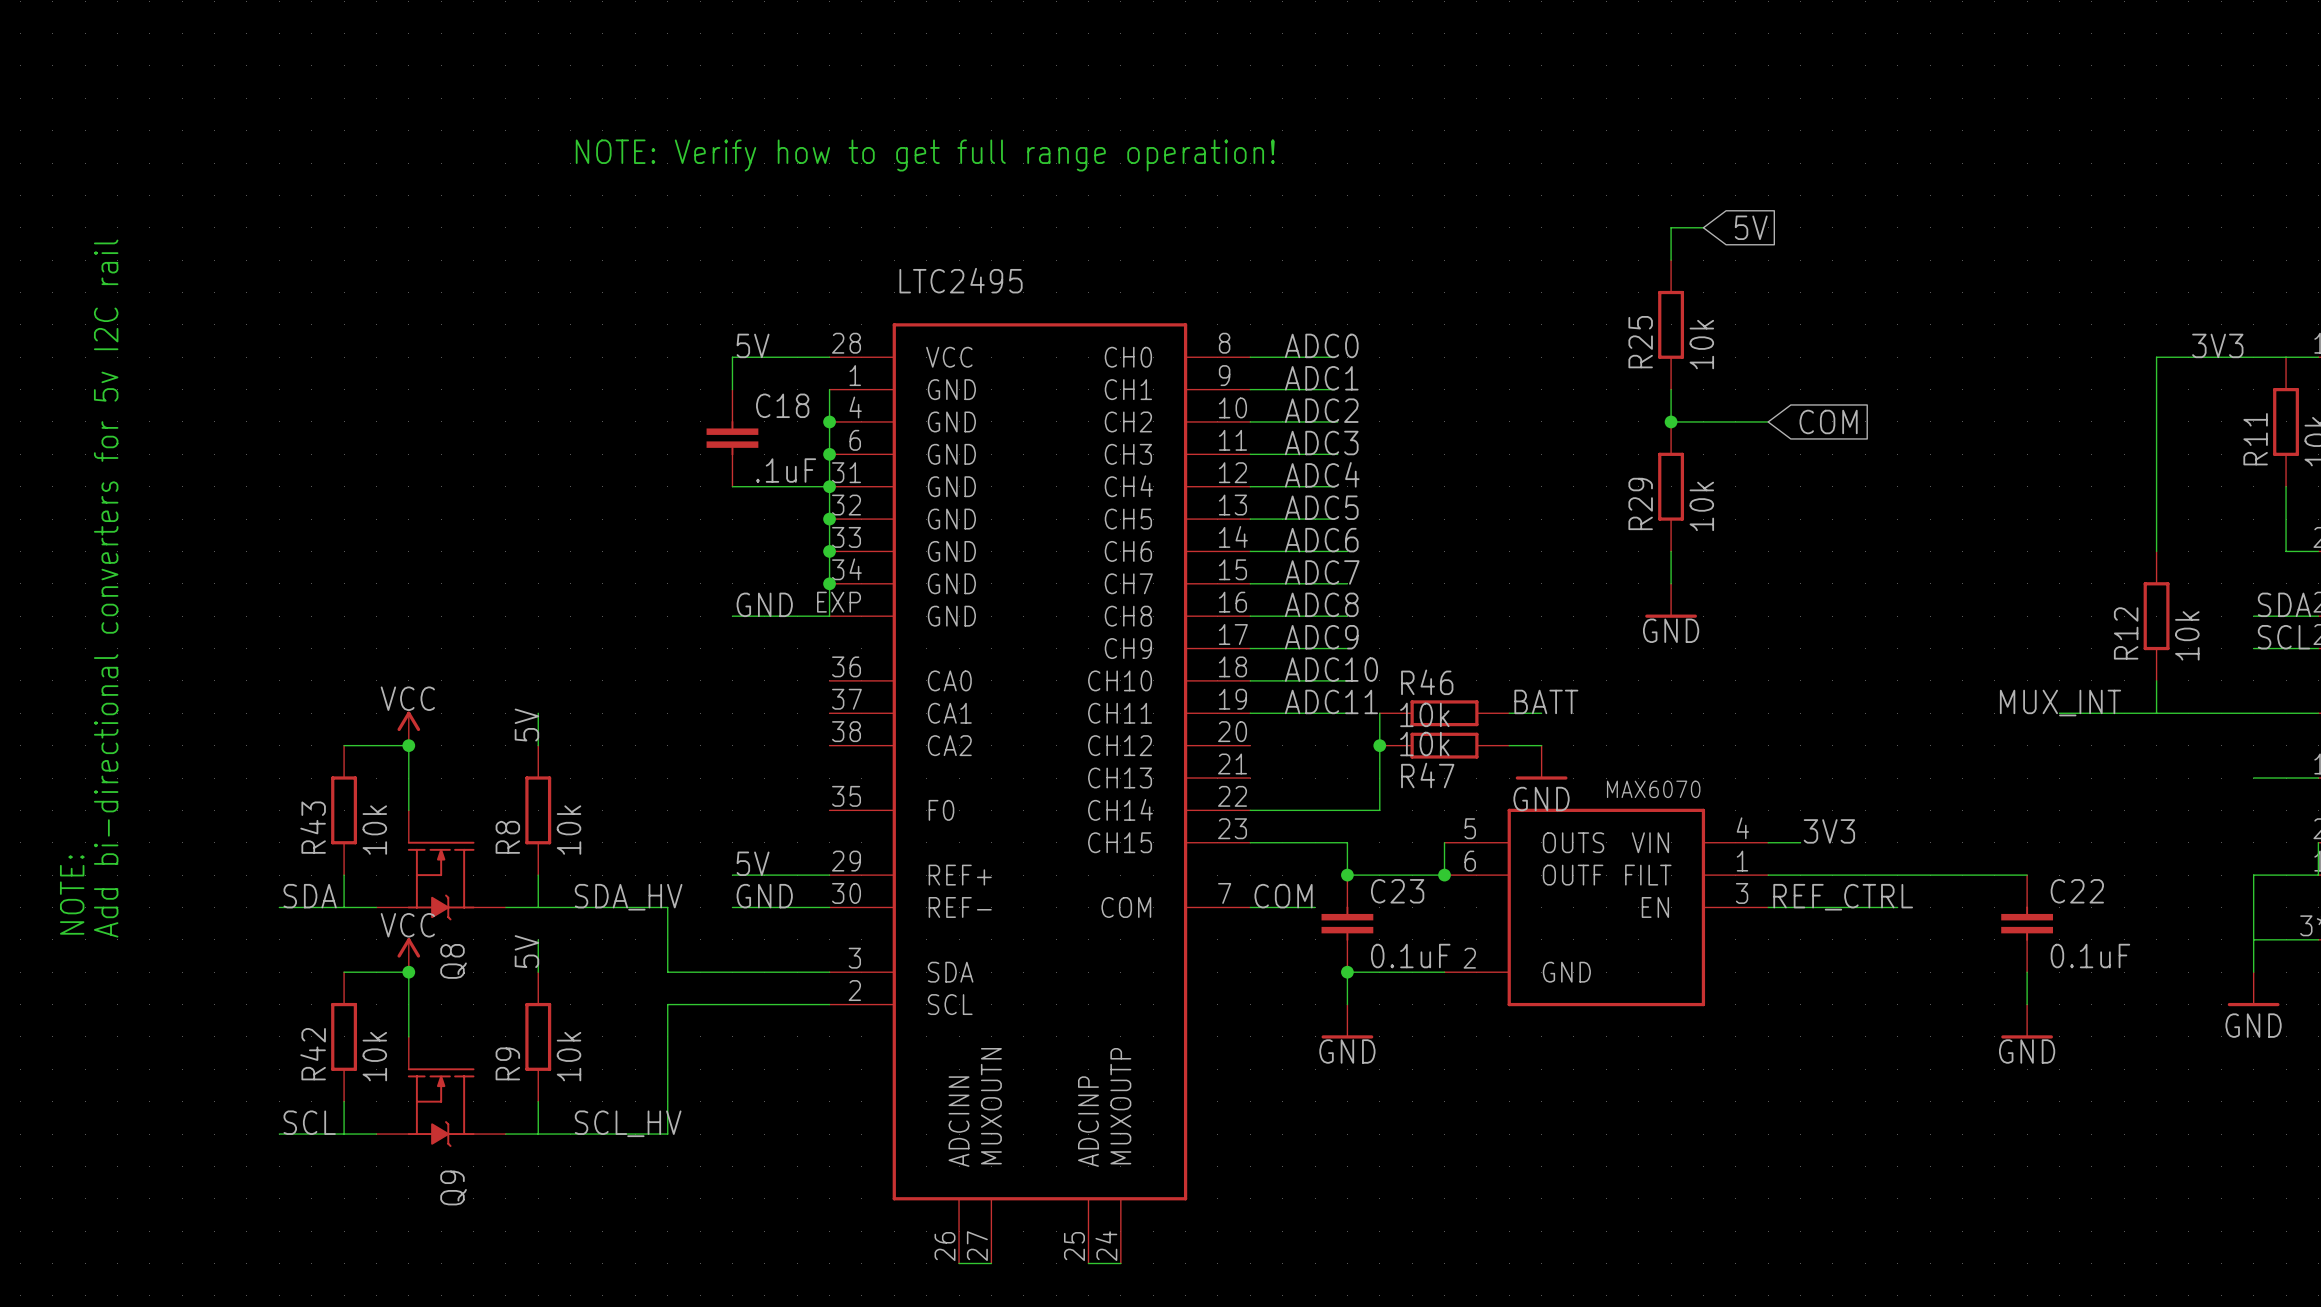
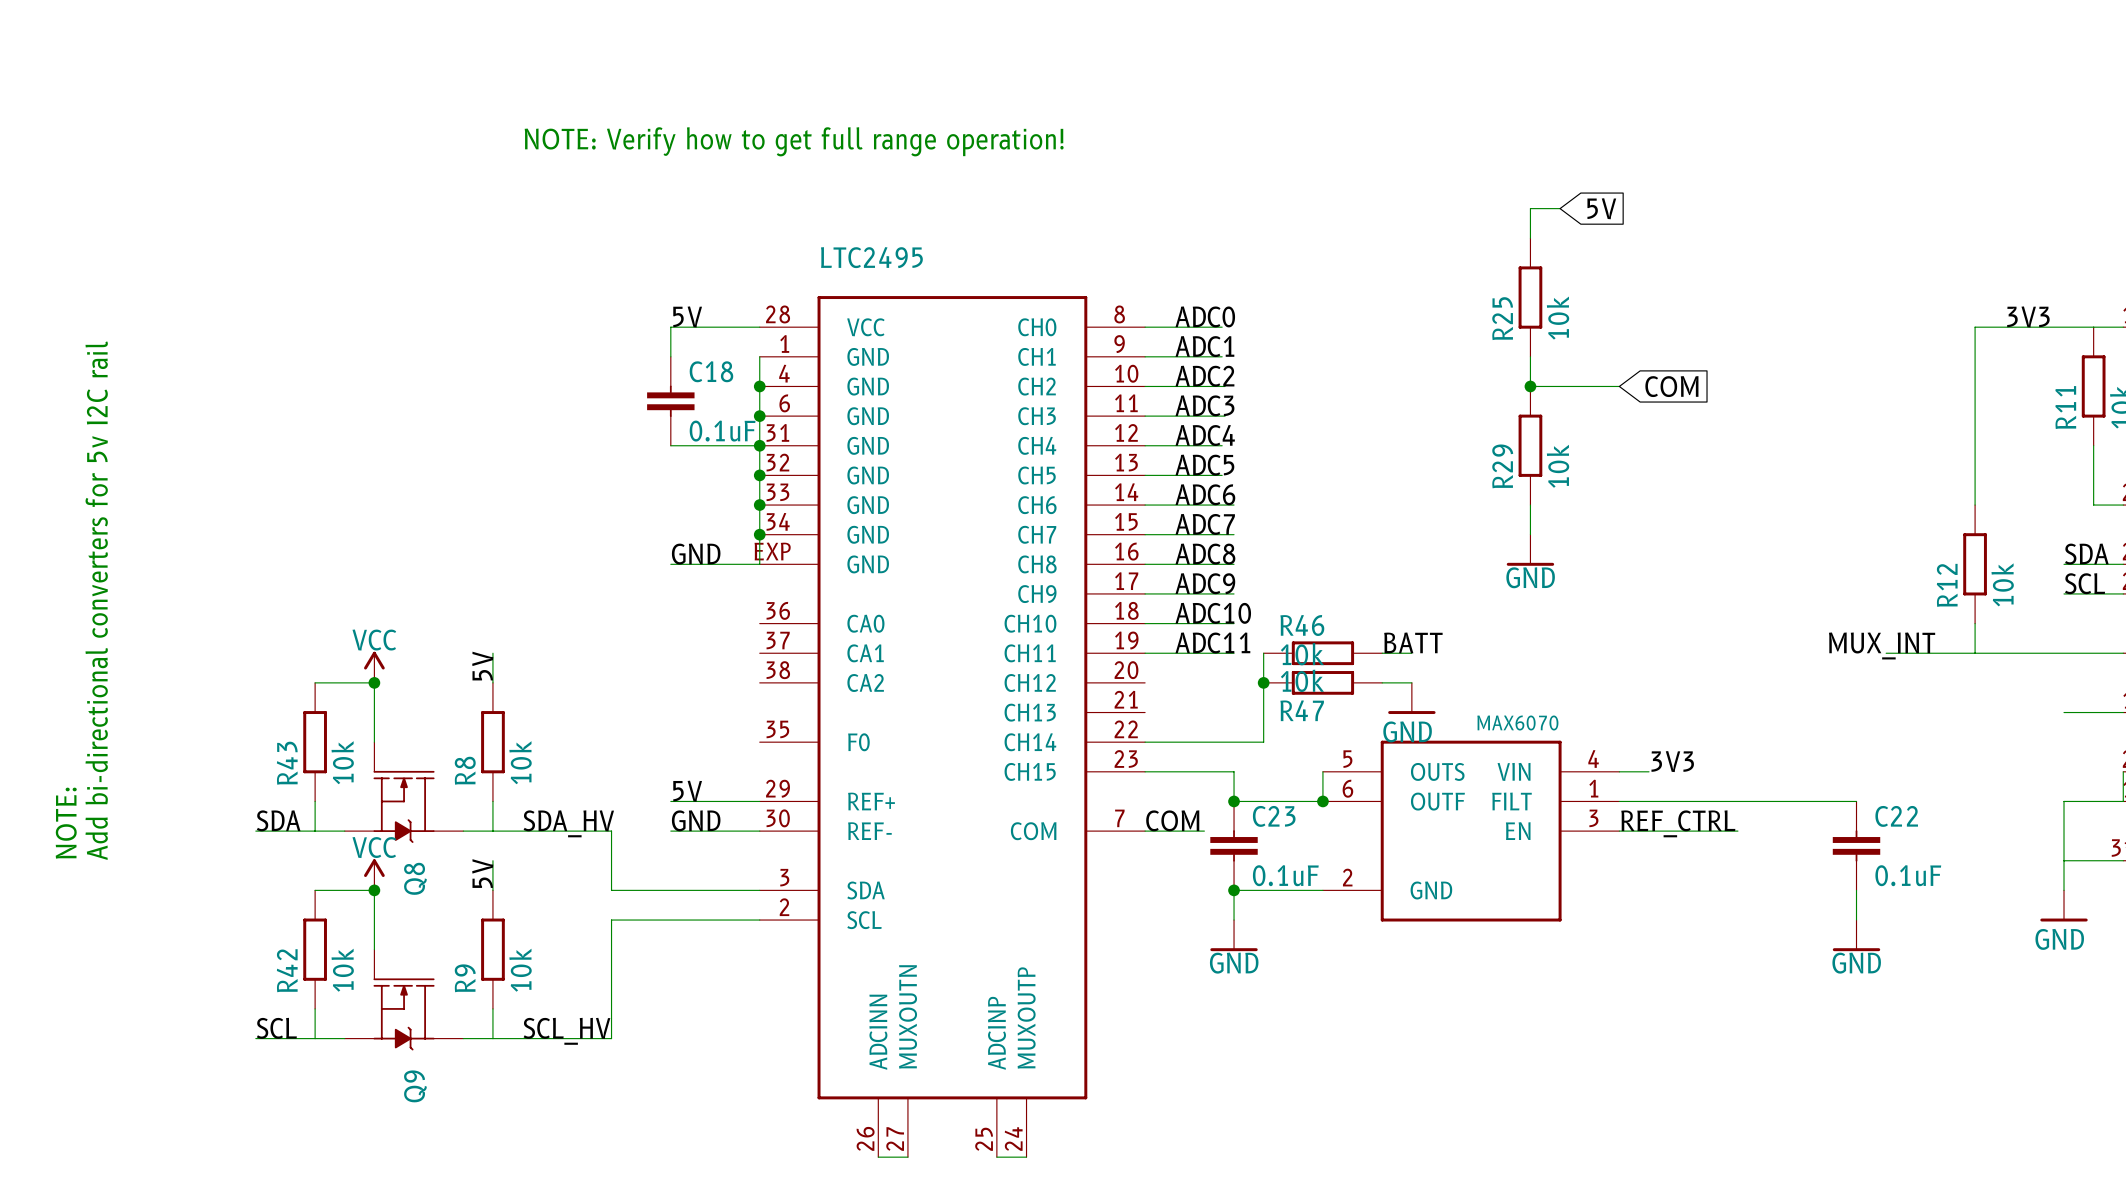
C18 value: .1uF (786, 470) -> 0.1uF (722, 431)

